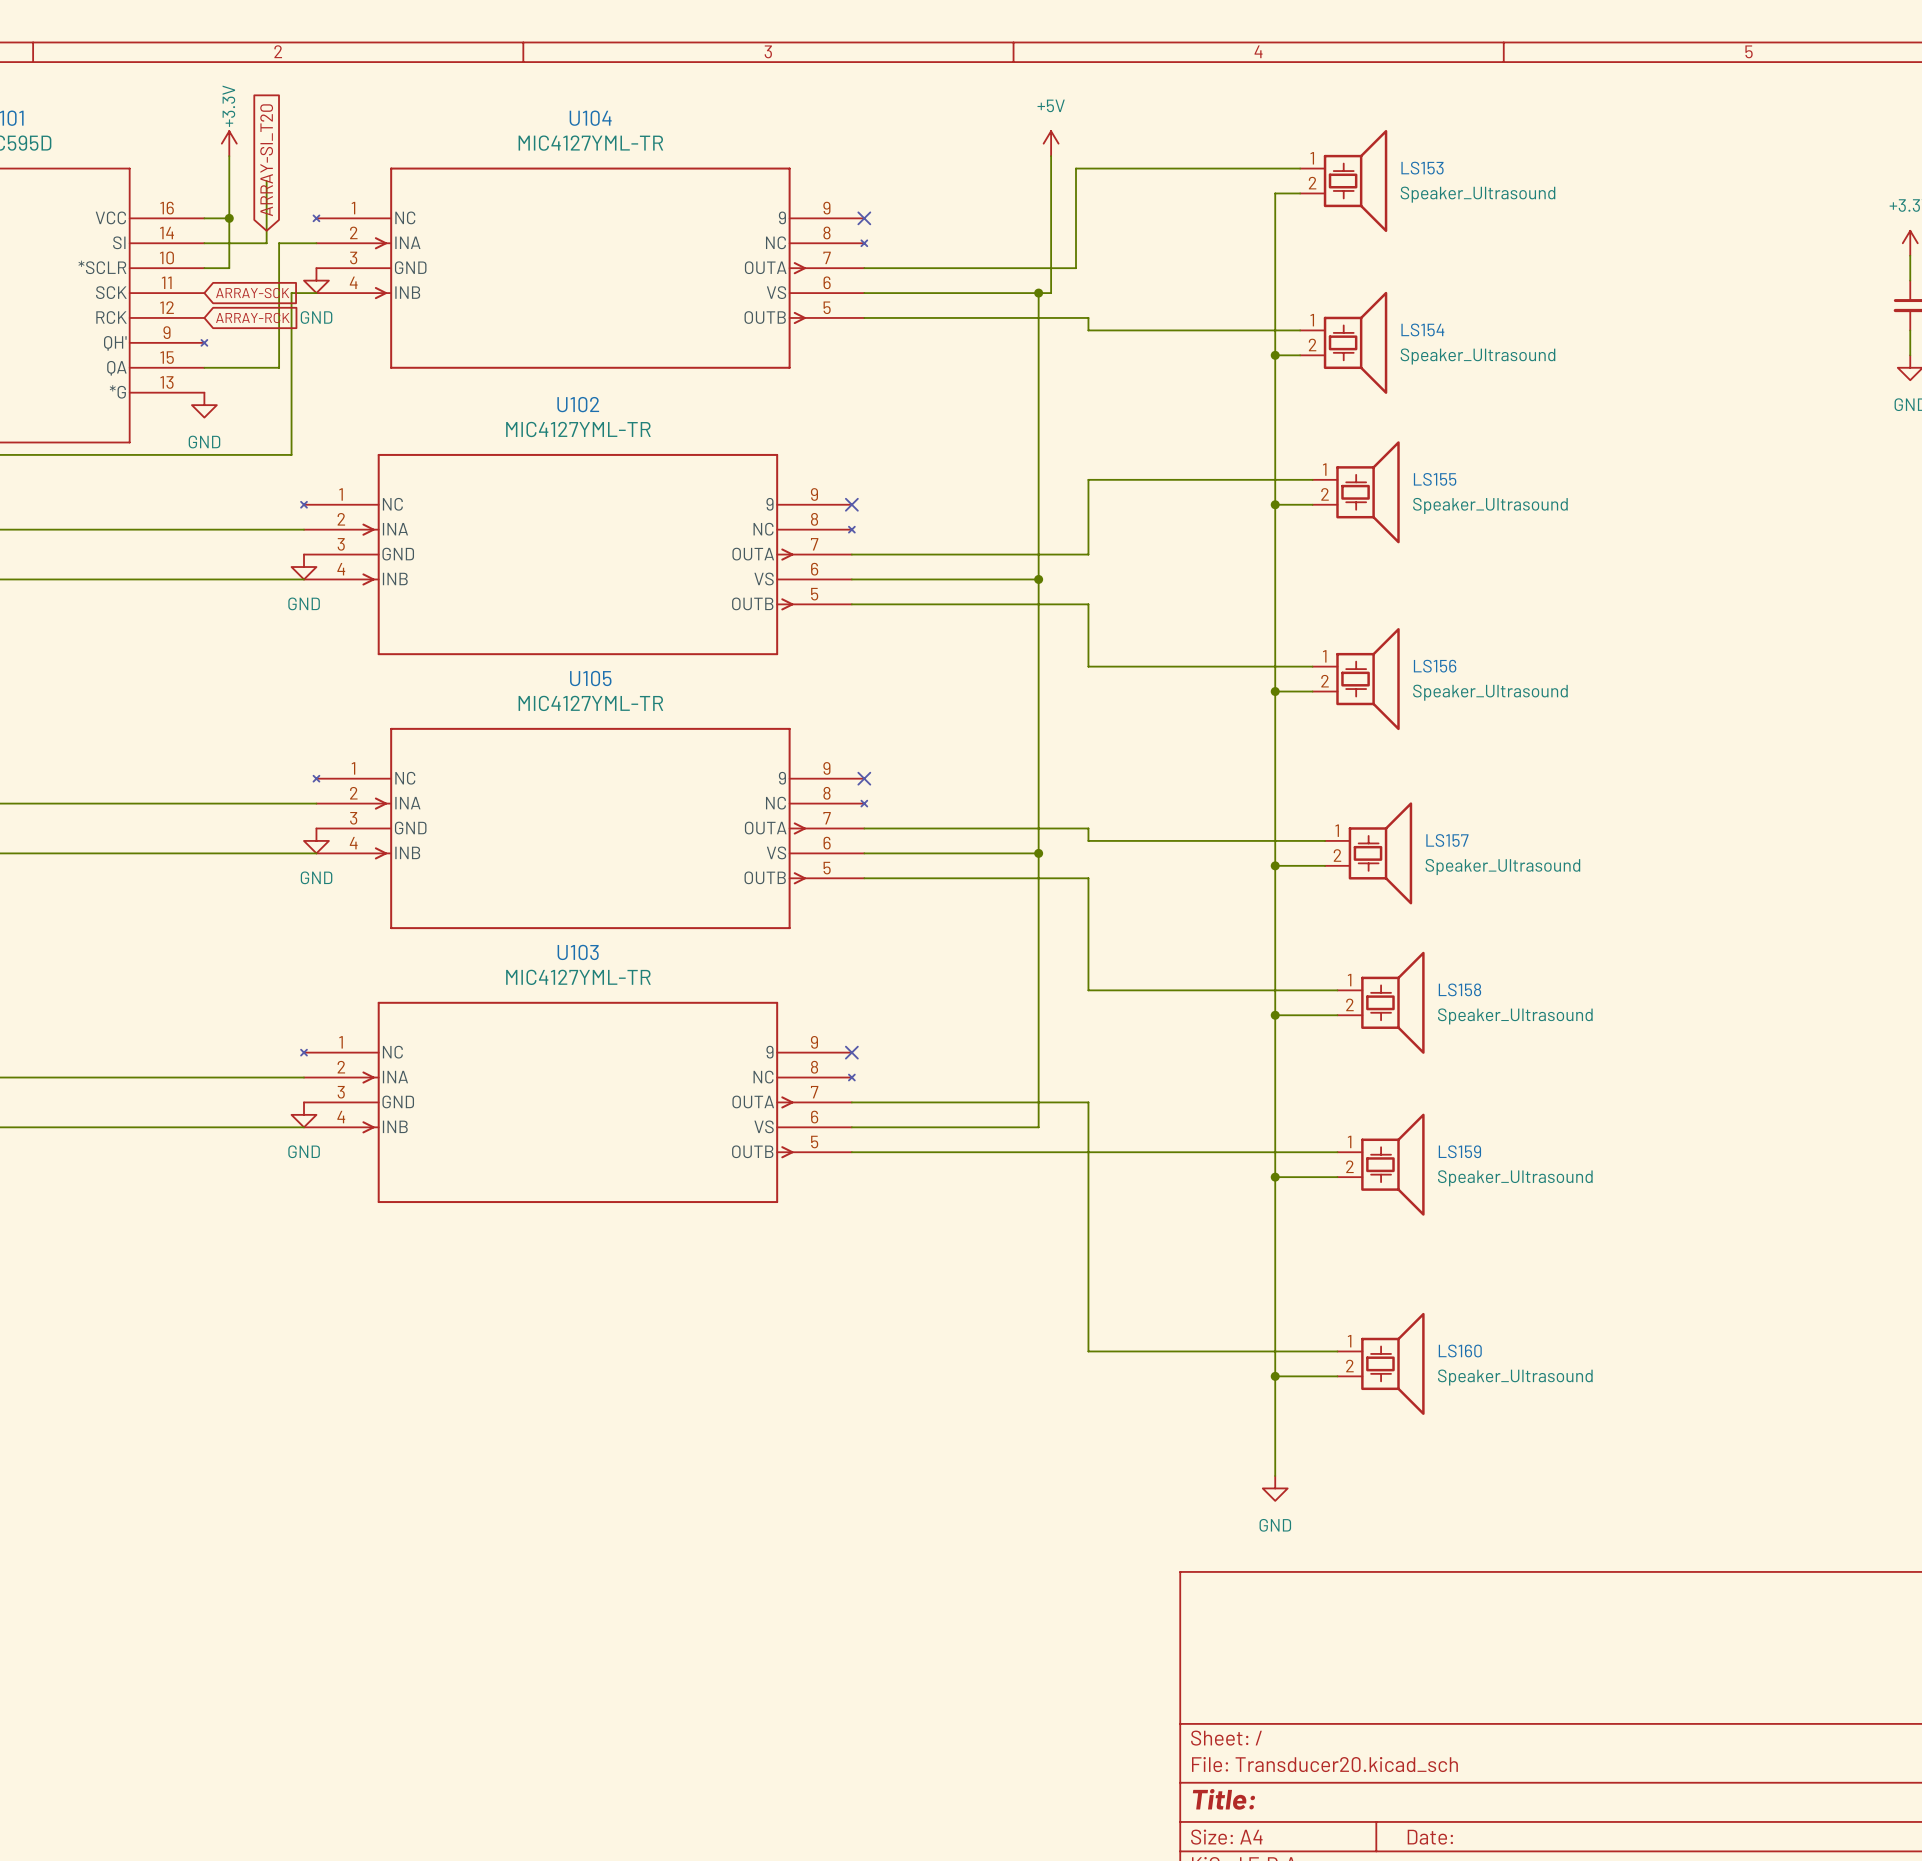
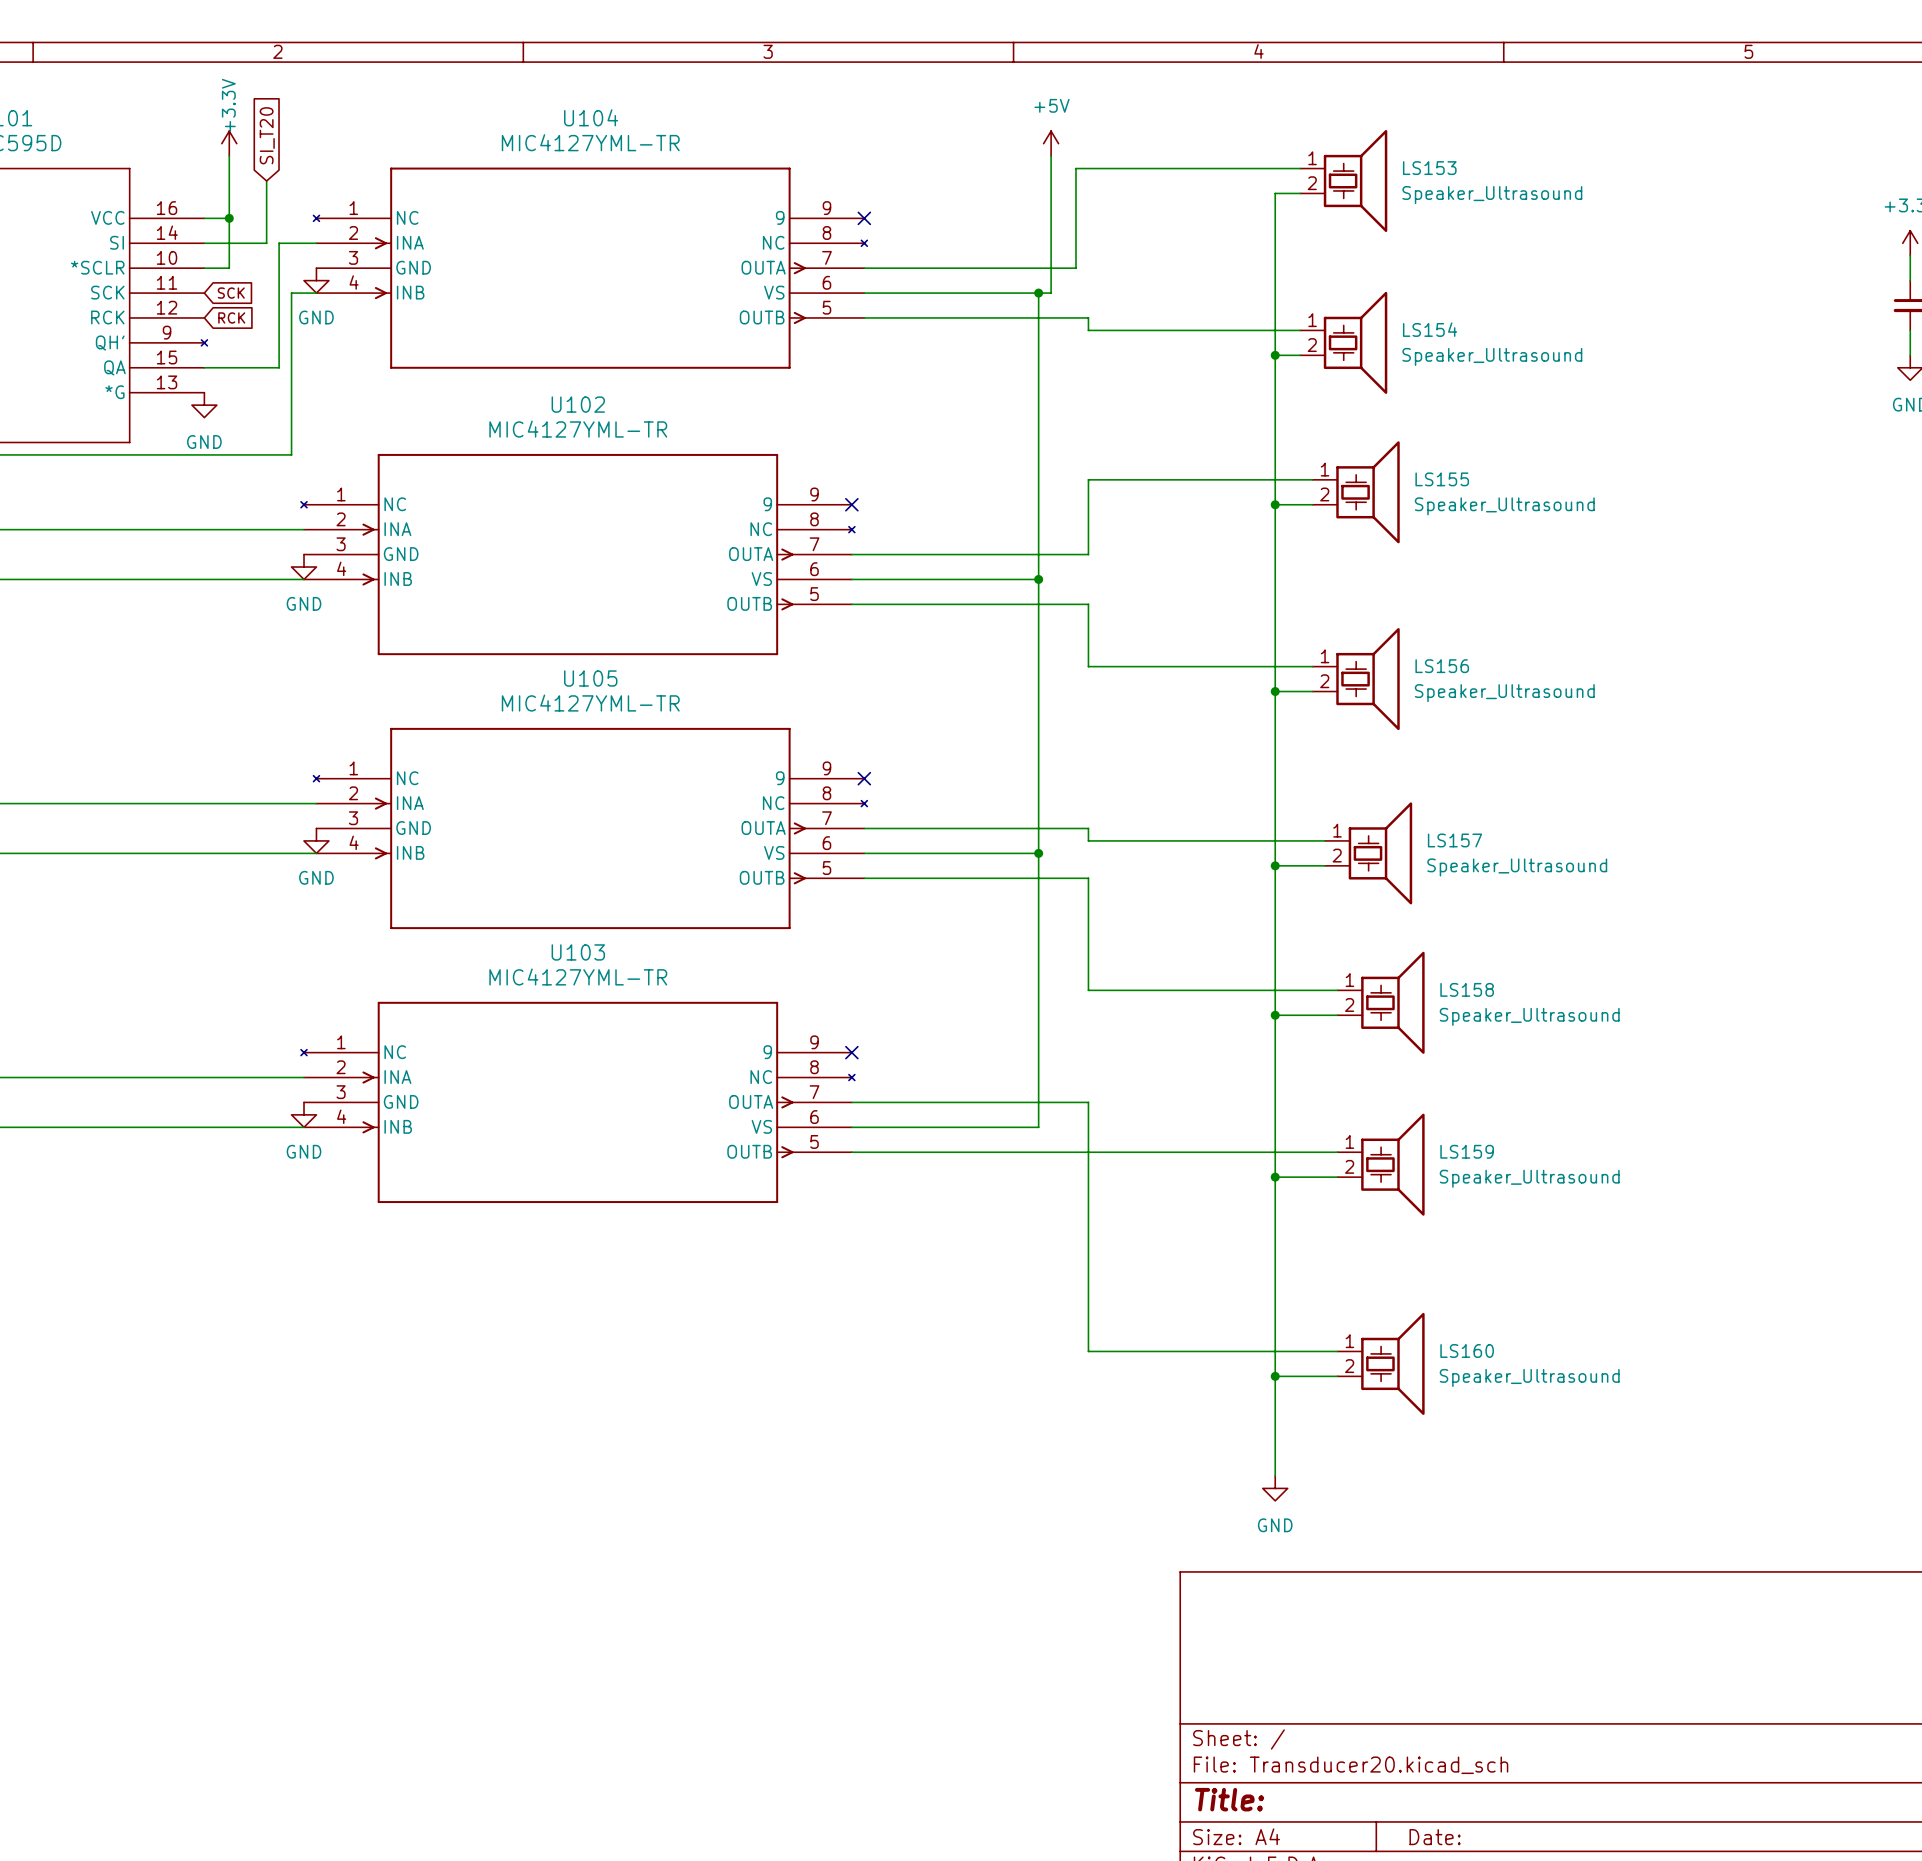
global label: ARRAY-SI_T20 (266, 160) -> SI_T20 (267, 135)
global label: ARRAY-SCK (252, 293) -> SCK (231, 293)
global label: ARRAY-RCK (252, 317) -> RCK (231, 317)

